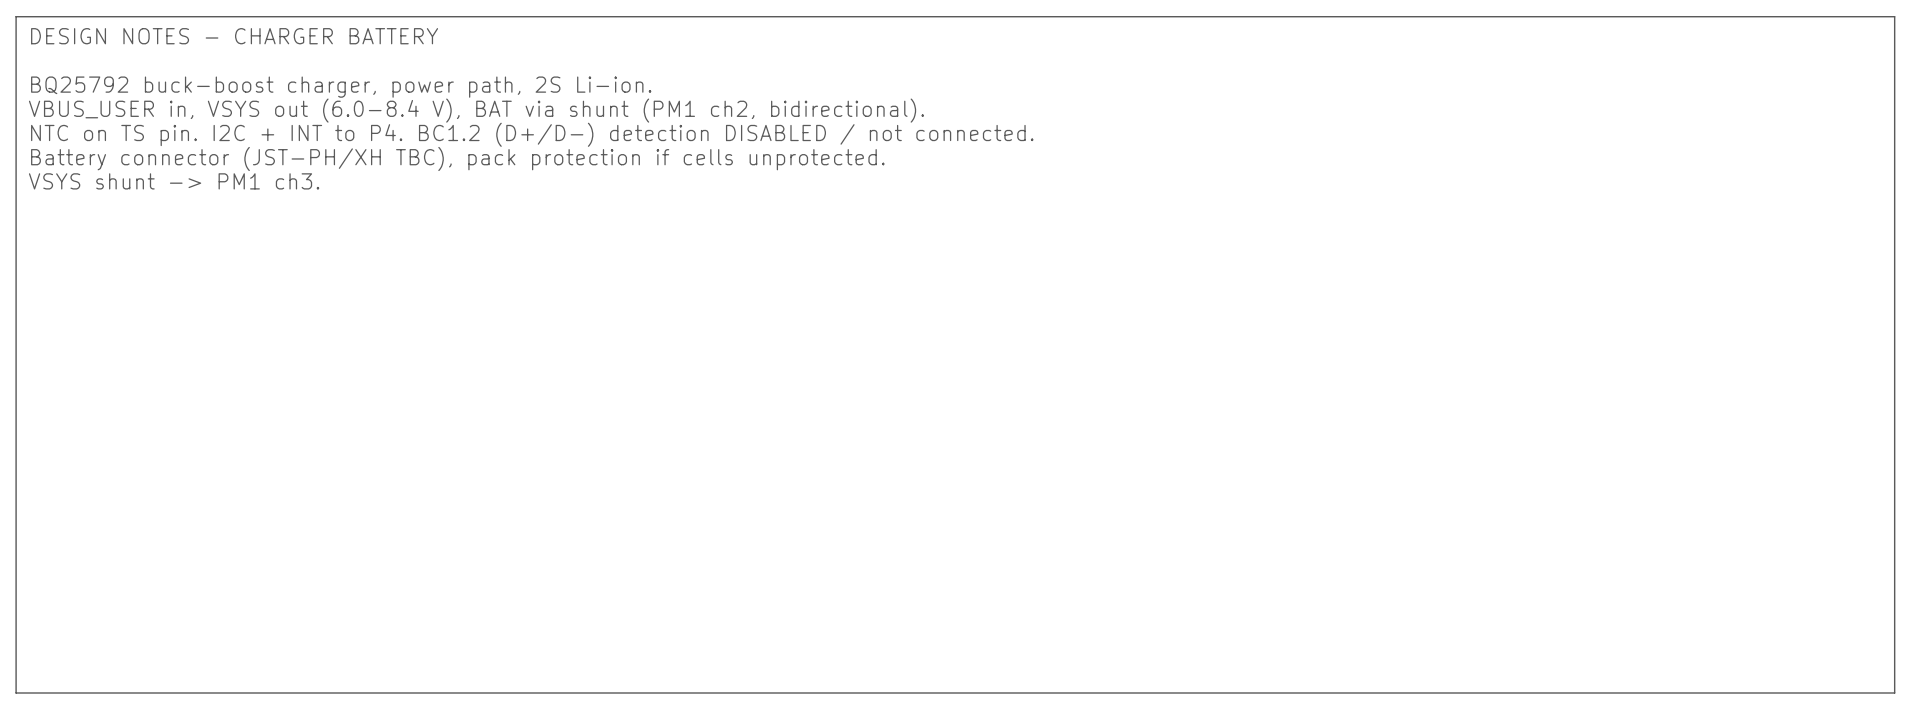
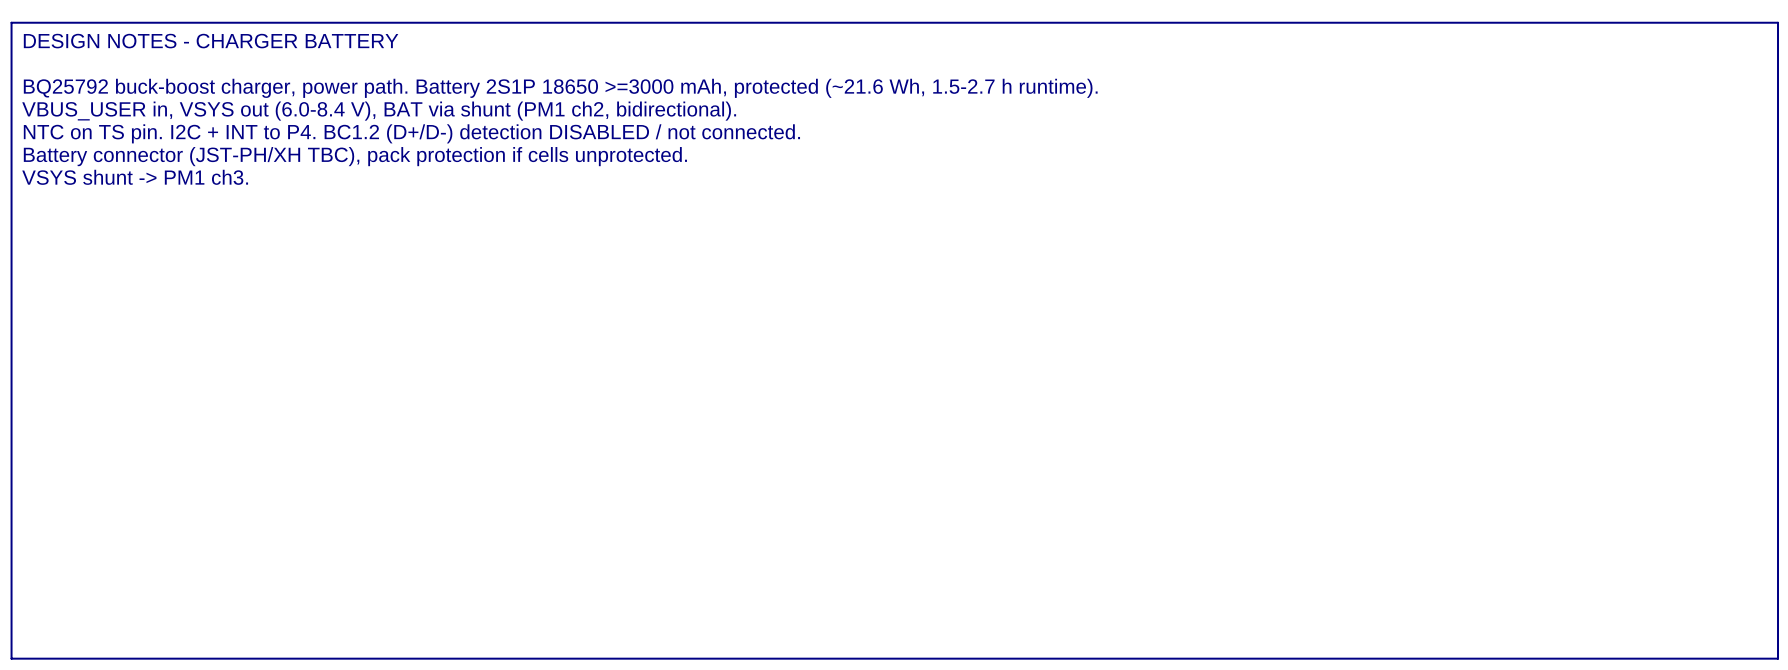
text: BQ25792 buck-boost charger, power path, 2S Li-ion. (341, 87) -> BQ25792 buck-boost charger, power path. Battery 2S1P 18650 >=3000 mAh, protected (~21.6 Wh, 1.5-2.7 h runtime). (560, 88)

